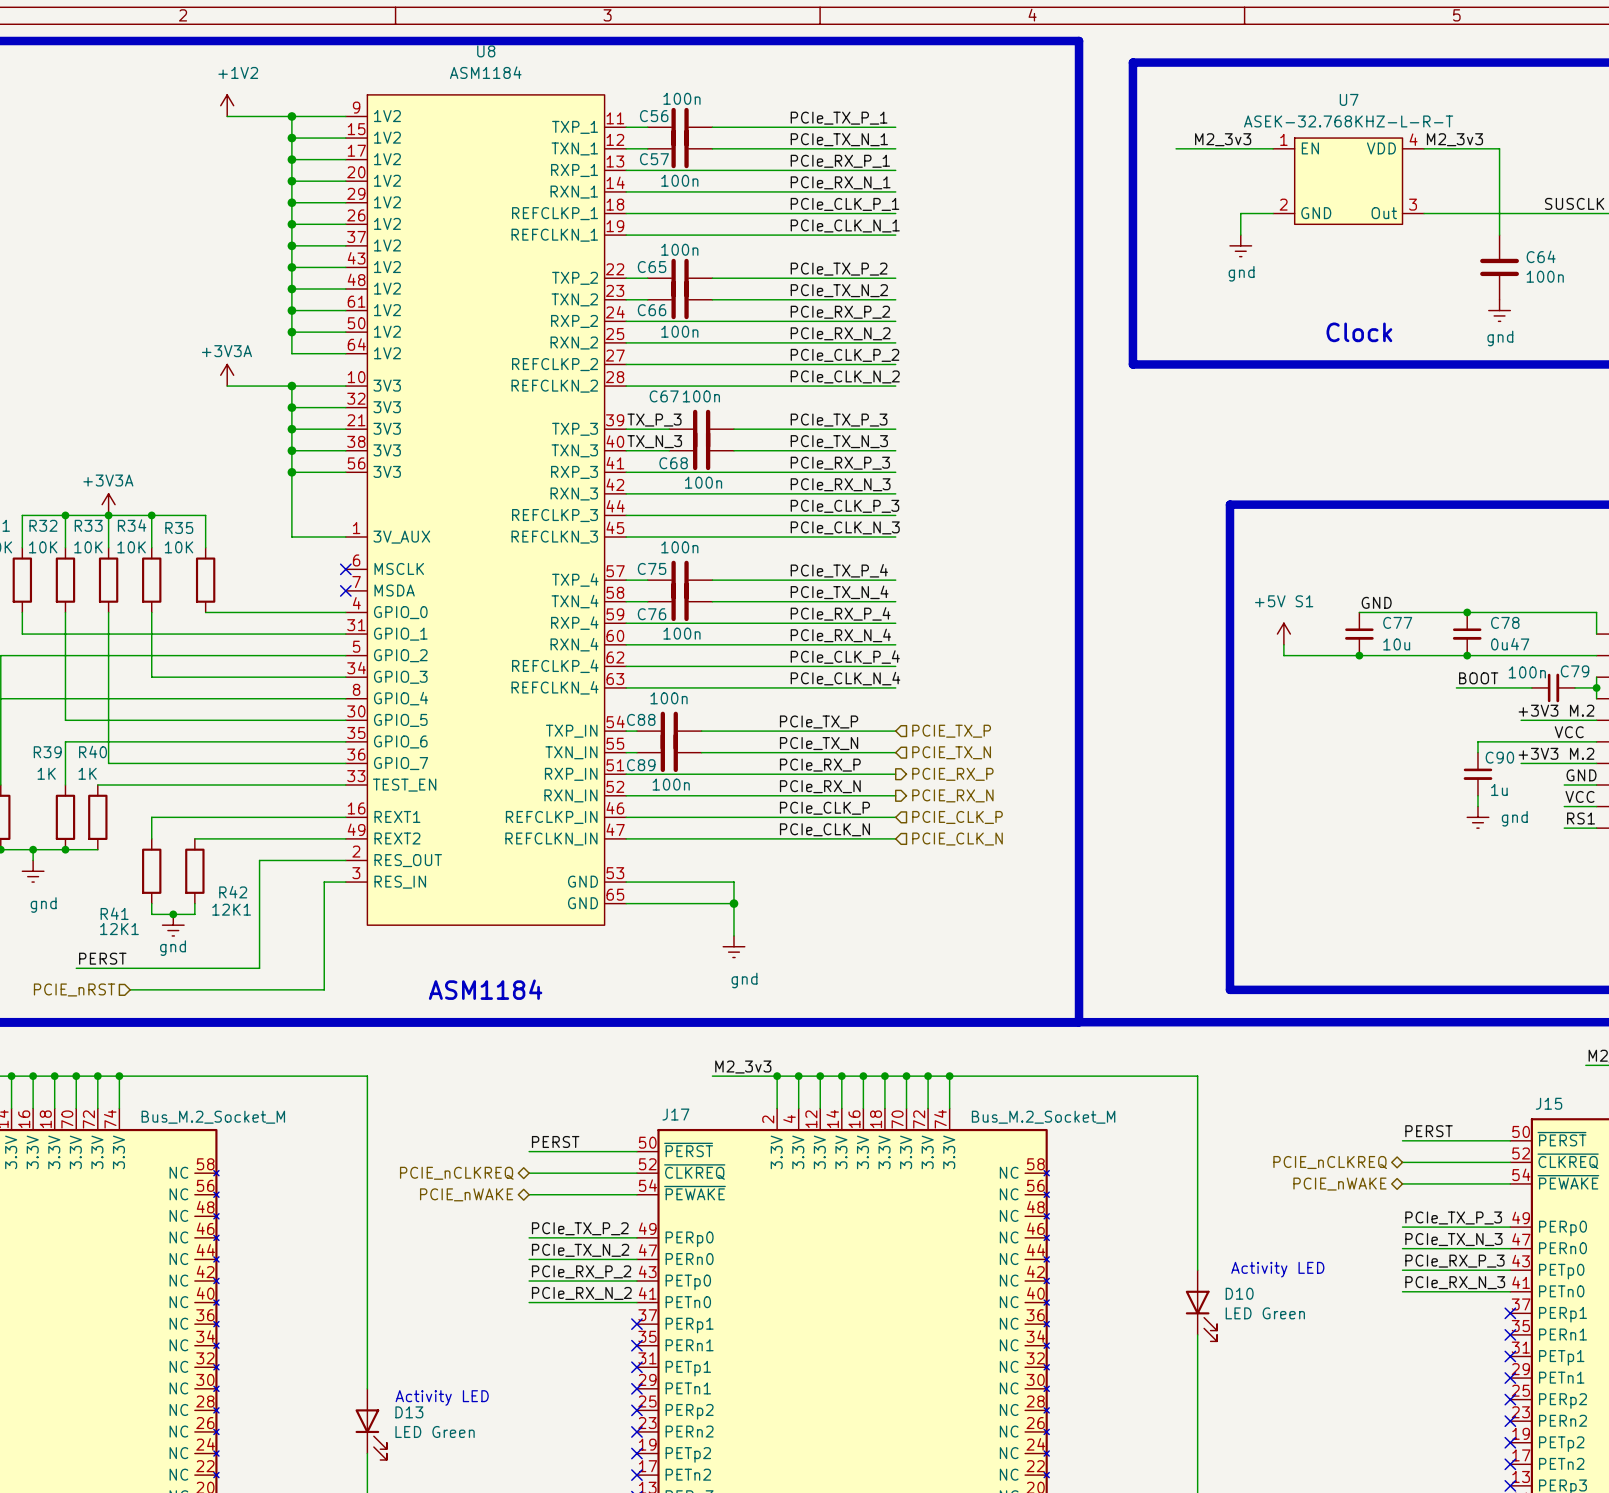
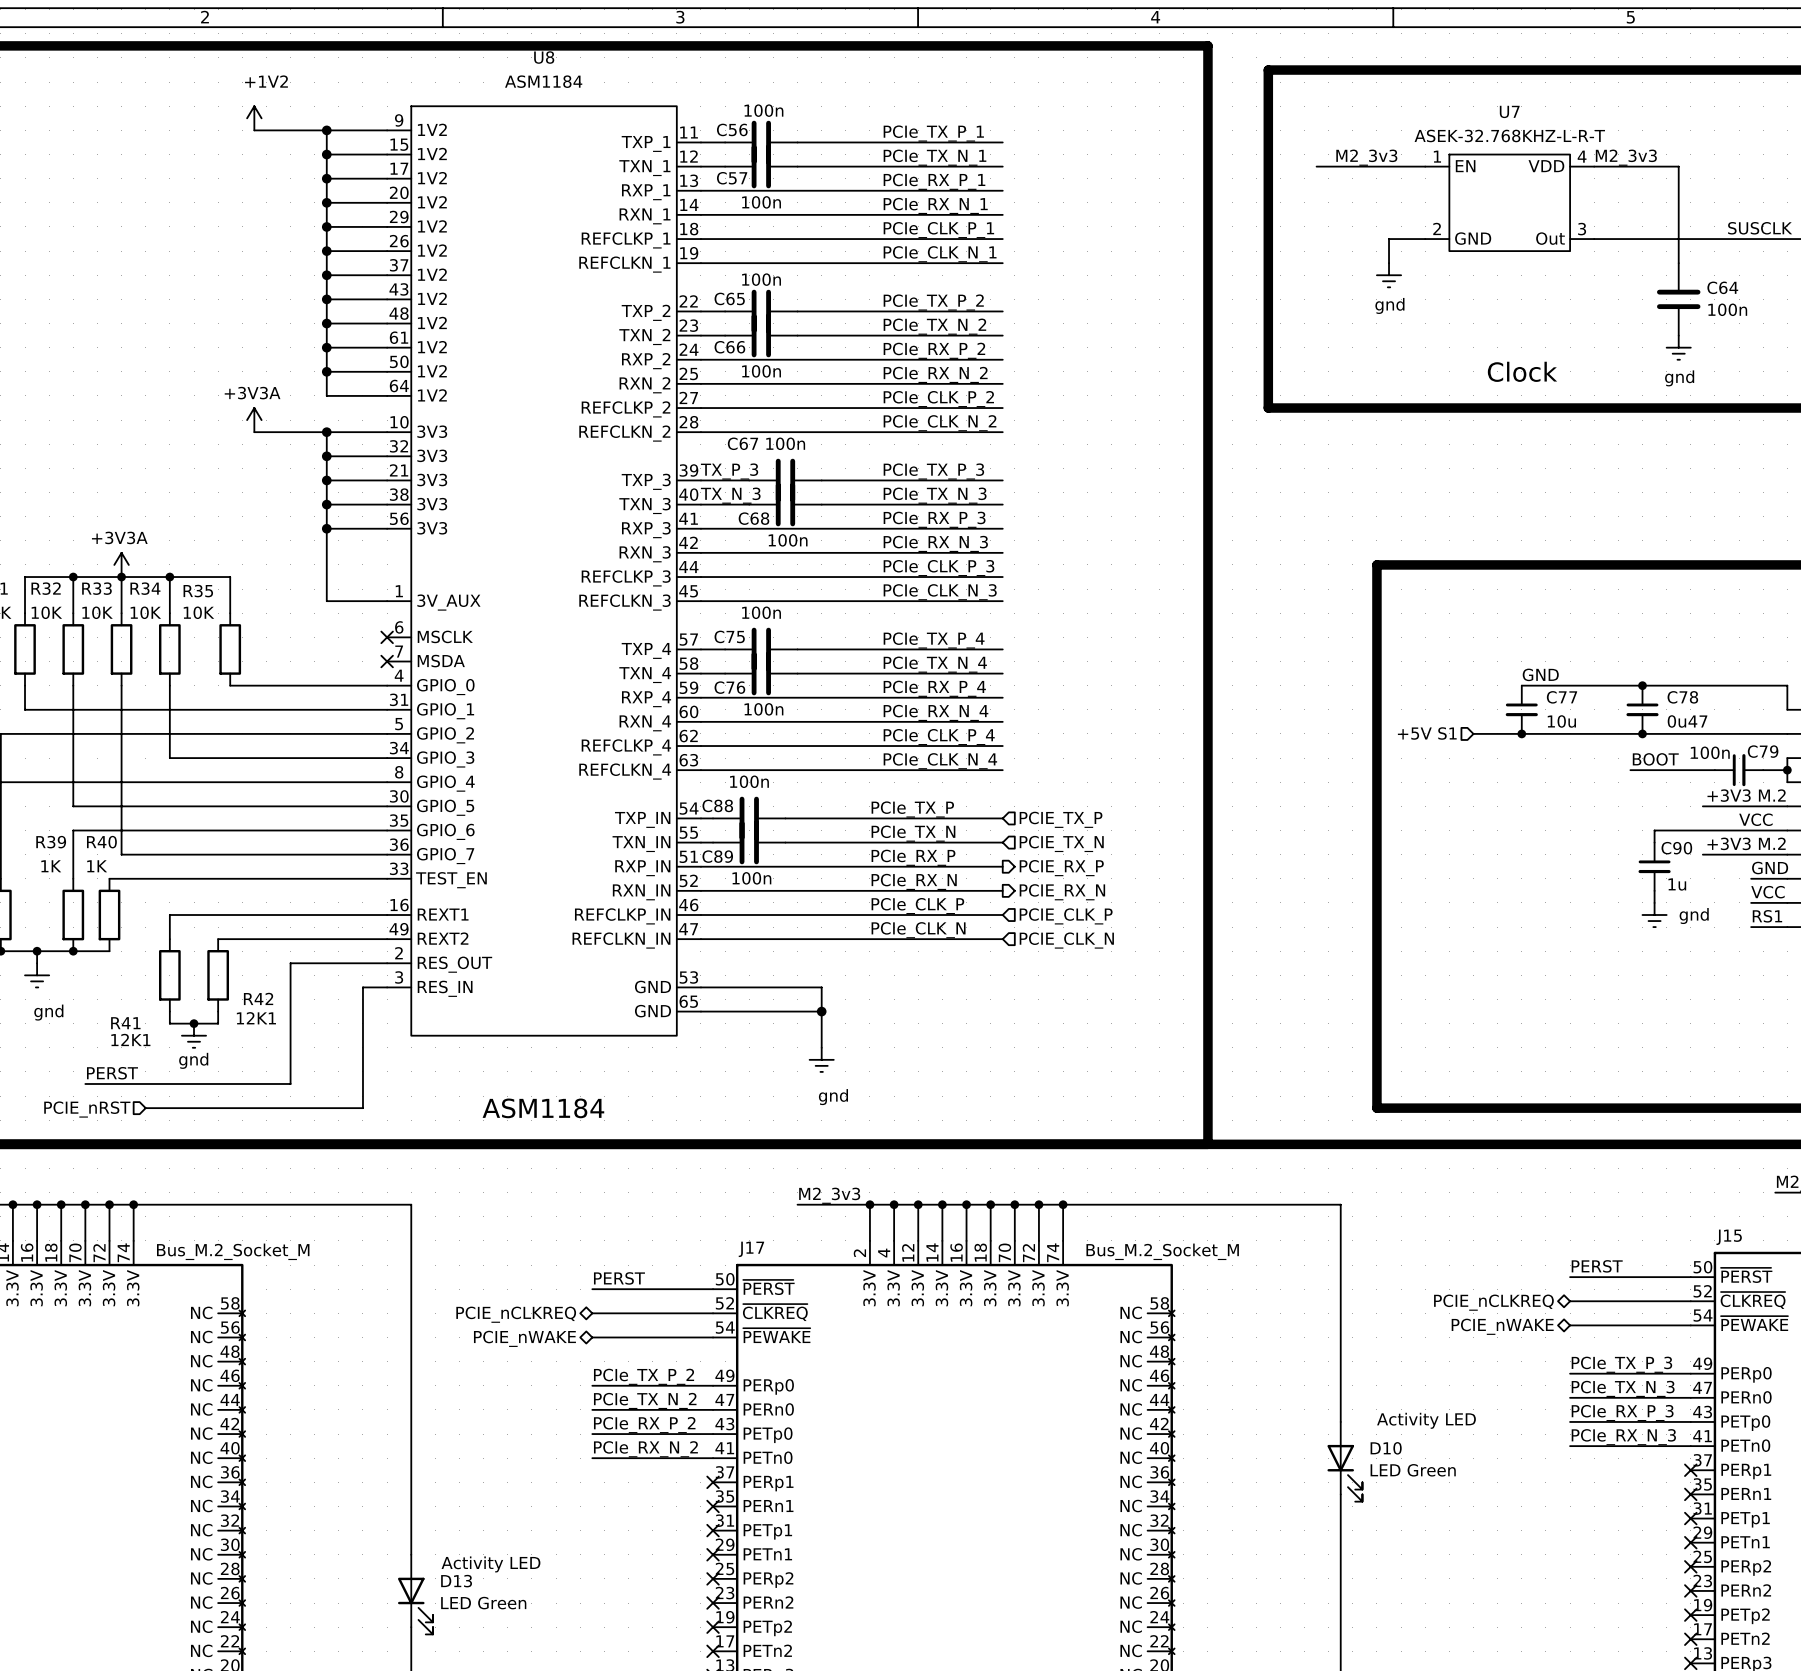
power symbol: +5V S1 (1283, 634) -> none
wire: (1283, 644) (1283, 655) (1316, 655) -> none
hierarchical label: none -> +5V S1 (1427, 733)

